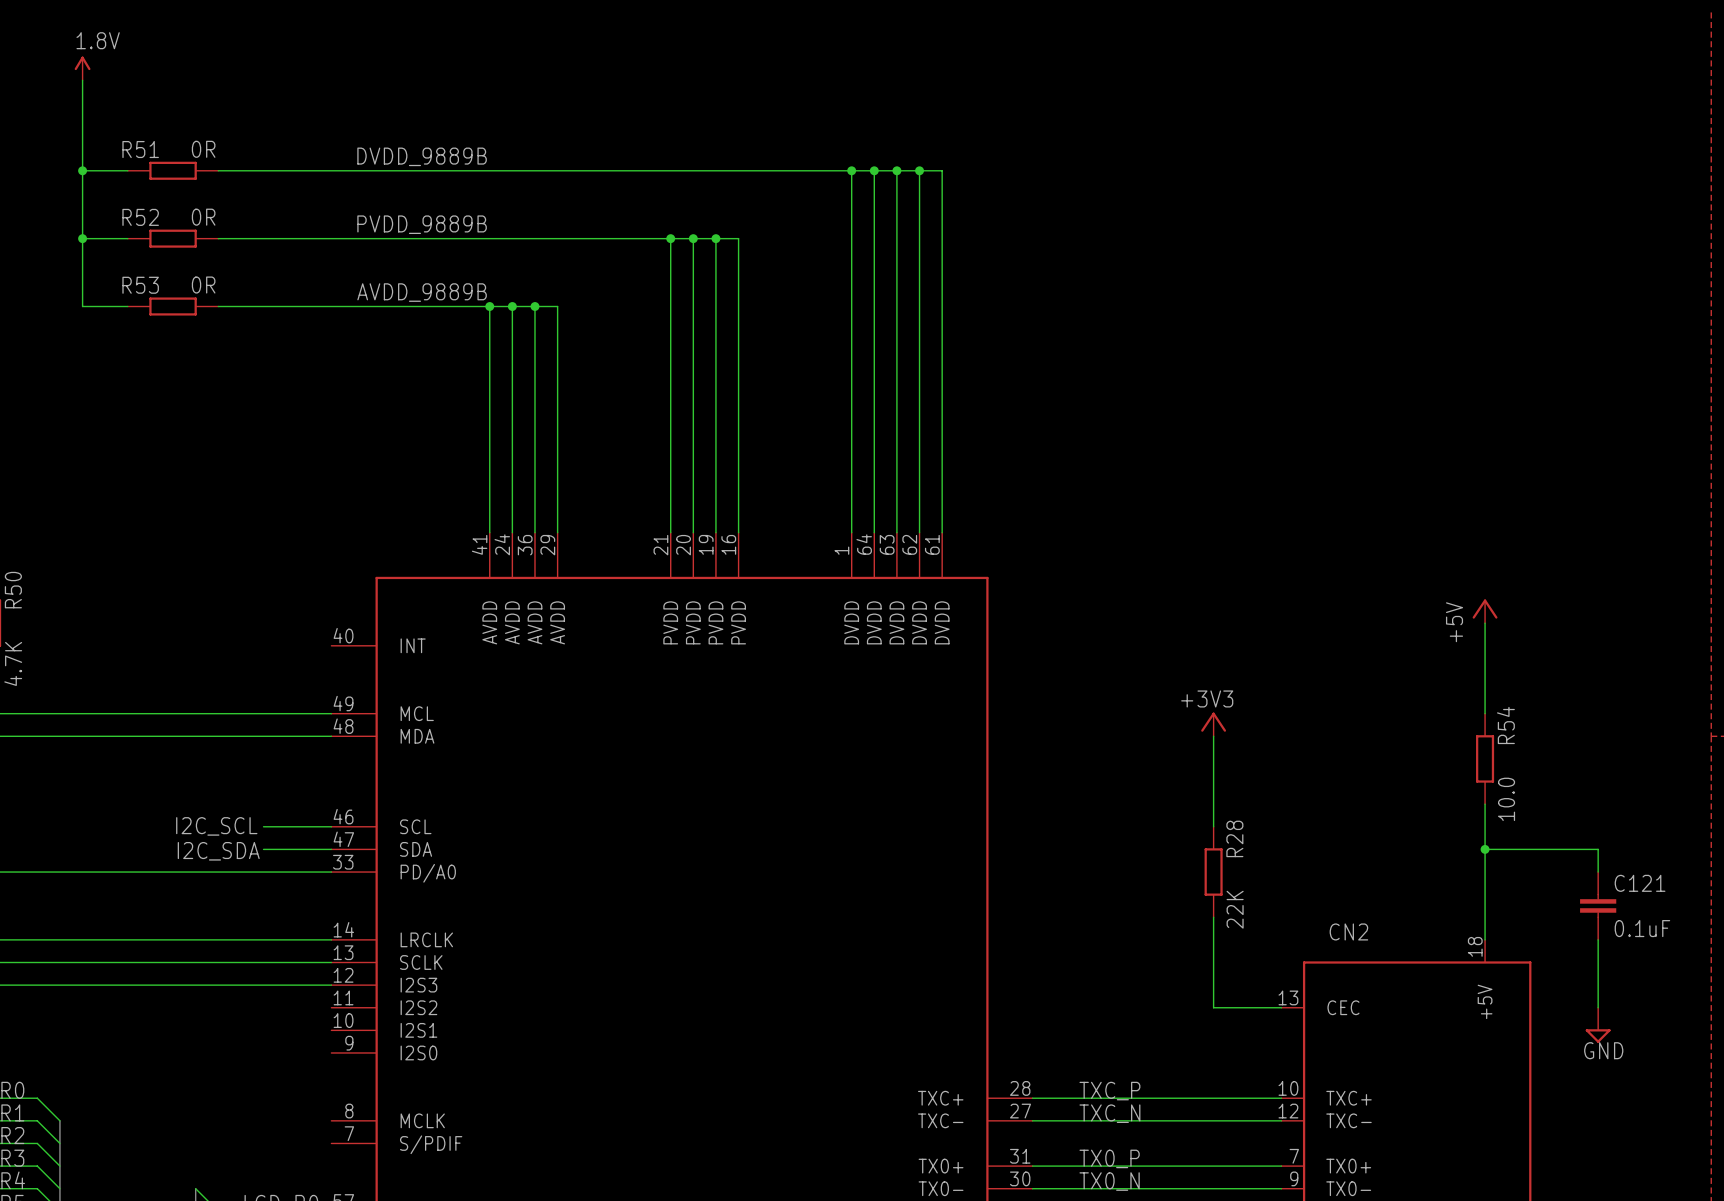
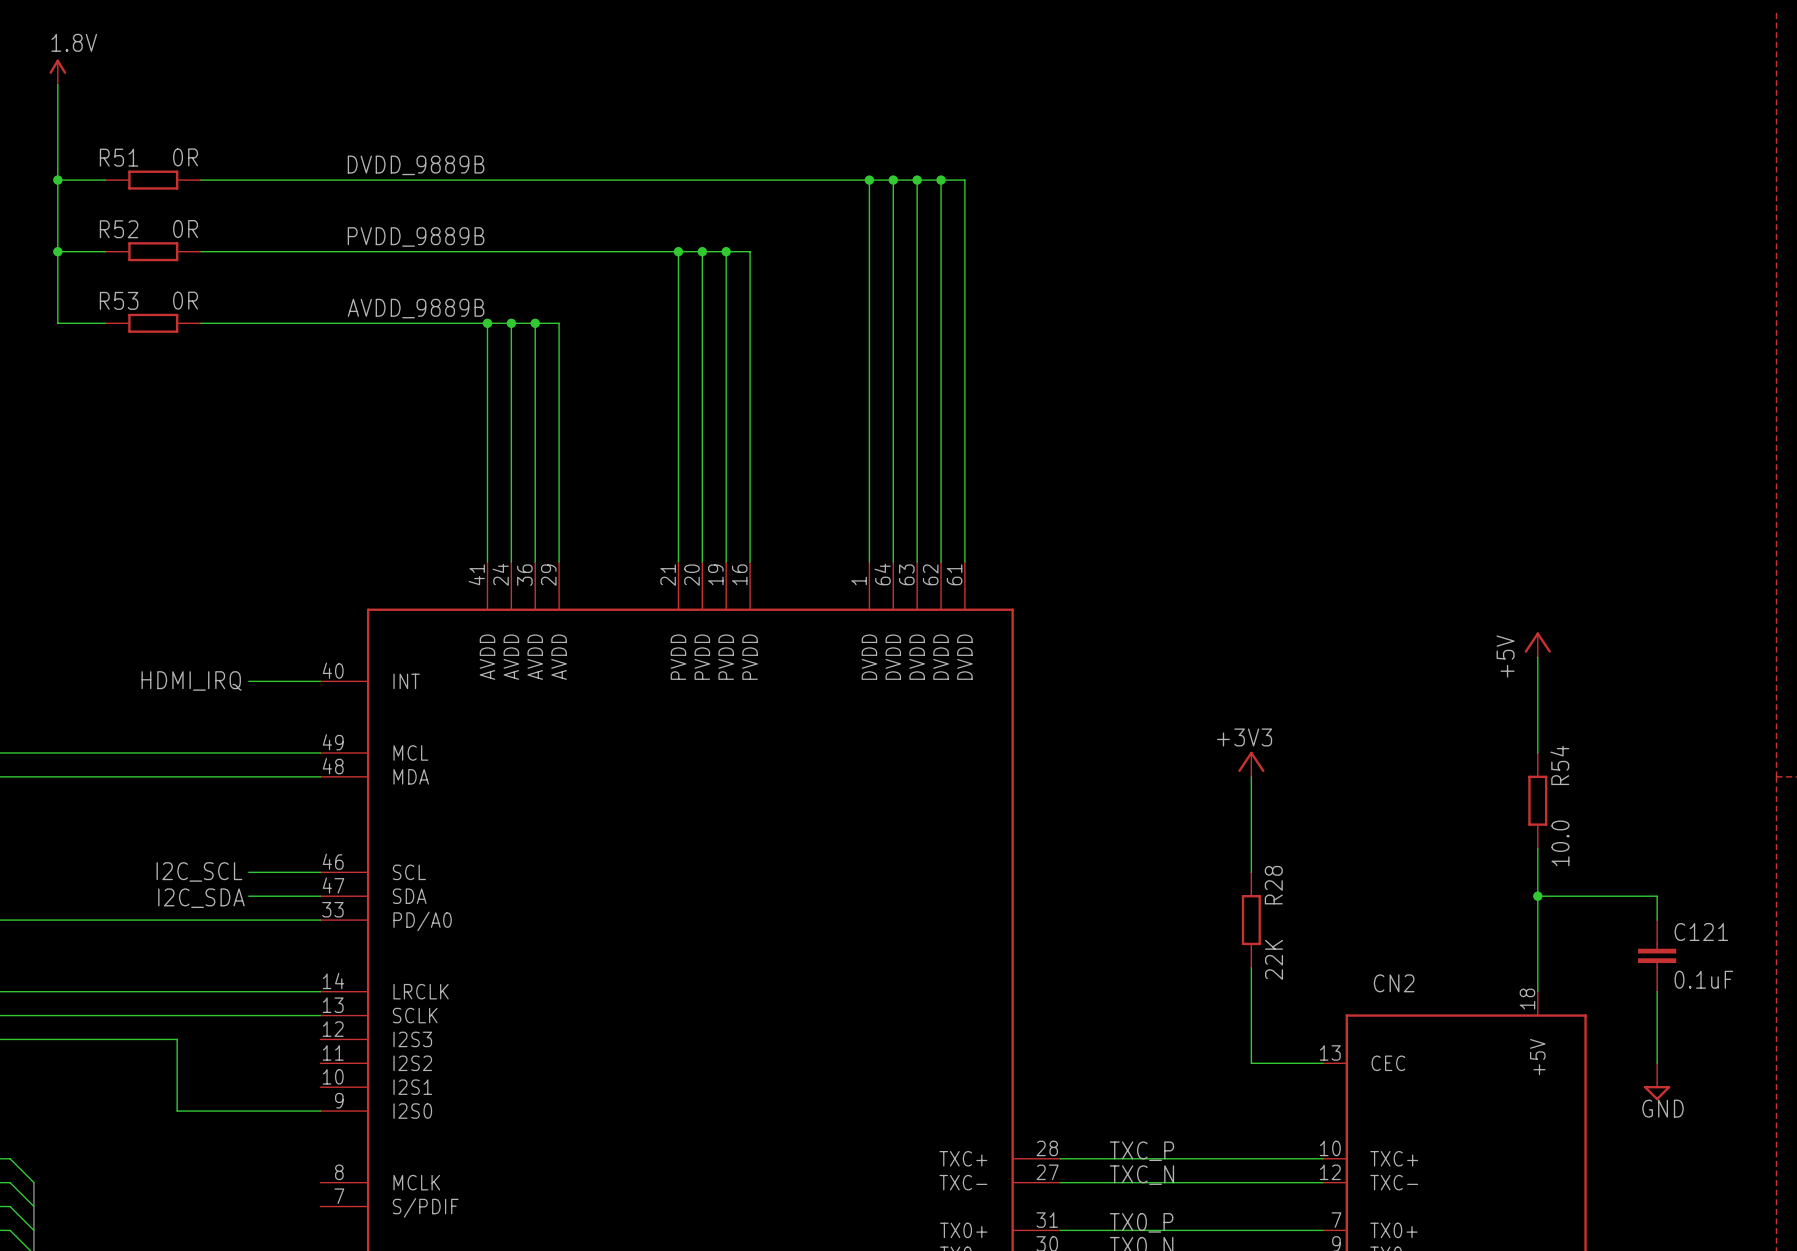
label: none -> HDMI_IRQ (191, 680)
wire: none -> (248, 681) (320, 681)
wire: (195, 985) (331, 985) -> (177, 1039) (177, 1111) (320, 1111)

